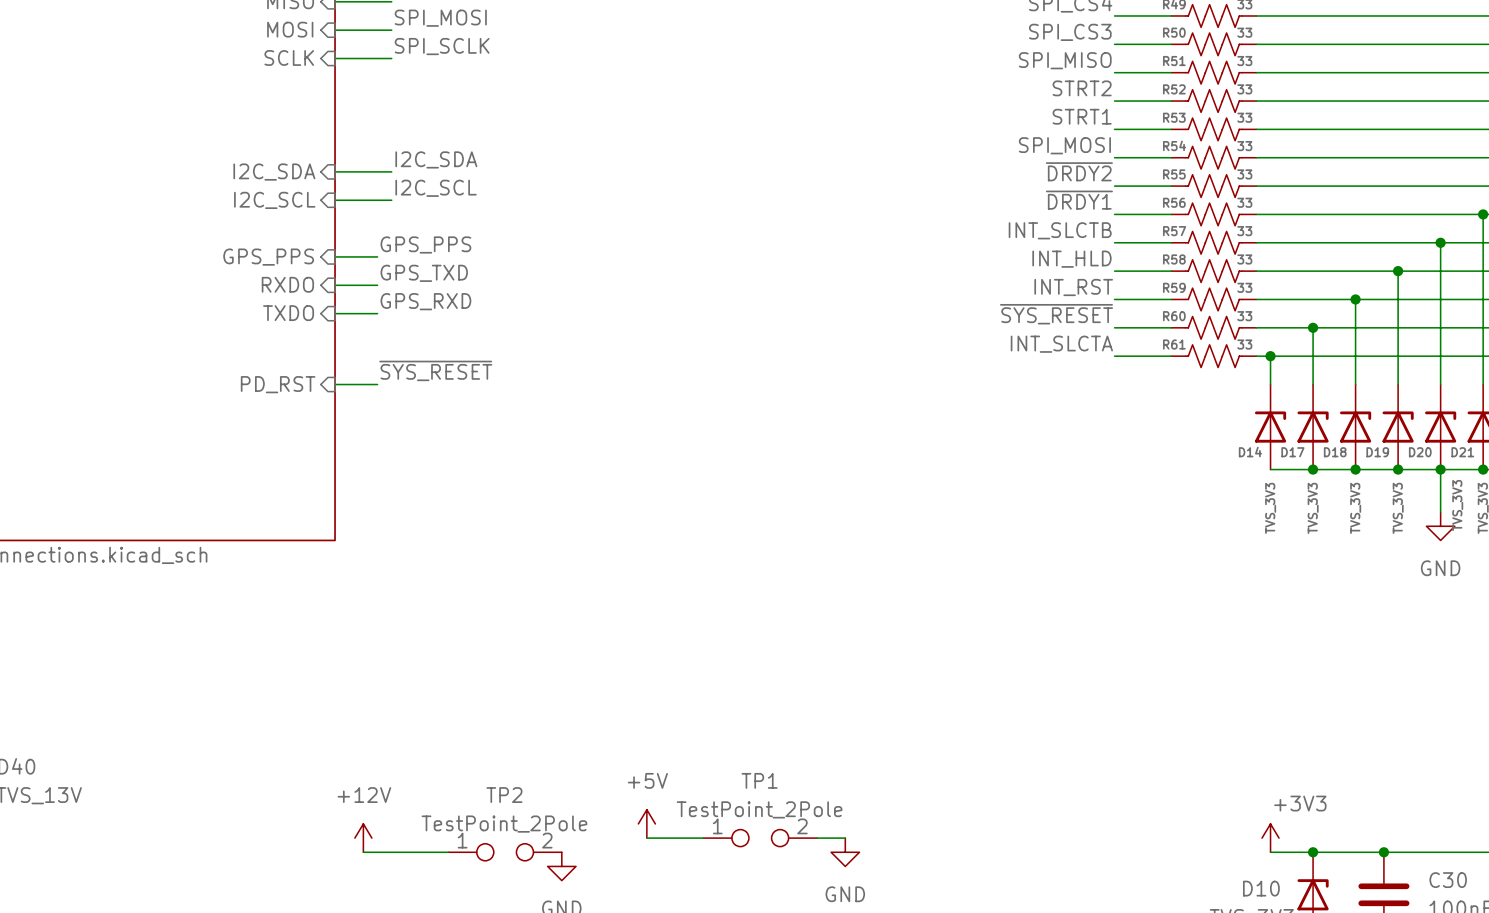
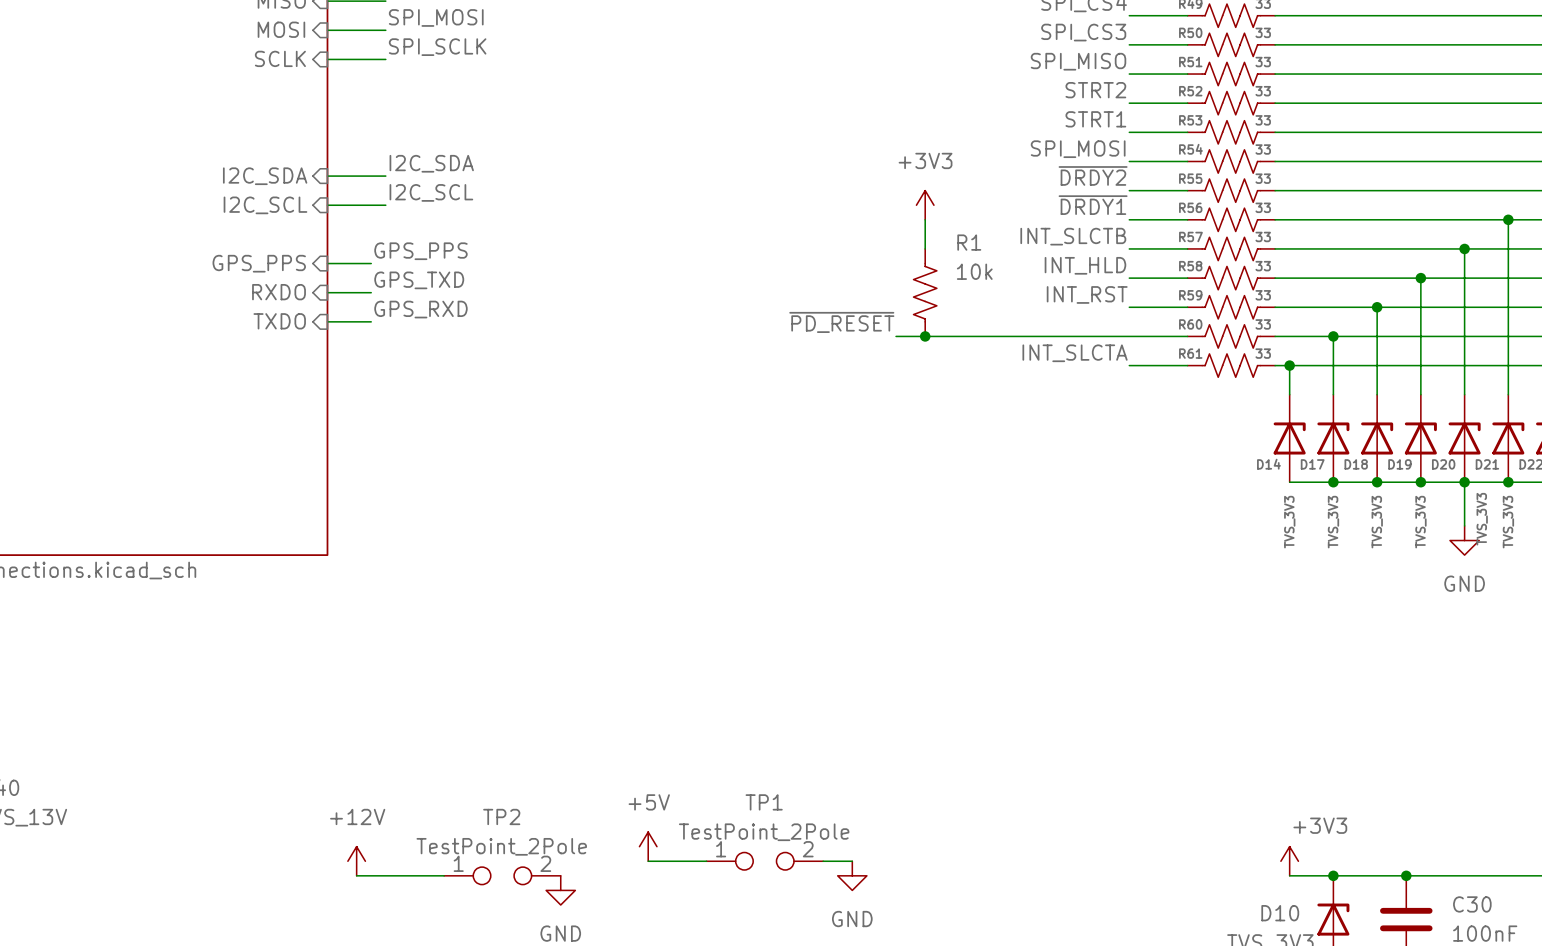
power symbol: none -> +3V3 (925, 205)
wire: none -> (925, 219) (925, 248)
R1: none -> 10k (925, 292)
label: none -> ~{PD_RESET} (841, 322)
label: ~{SYS_RESET} (1056, 314) -> none
wire: none -> (896, 336) (1129, 336)
junction: none -> (925, 336)
label: ~{SYS_RESET} (435, 370) -> none
sheet pin: PD_RST (278, 384) -> none
wire: (335, 384) (377, 384) -> none

